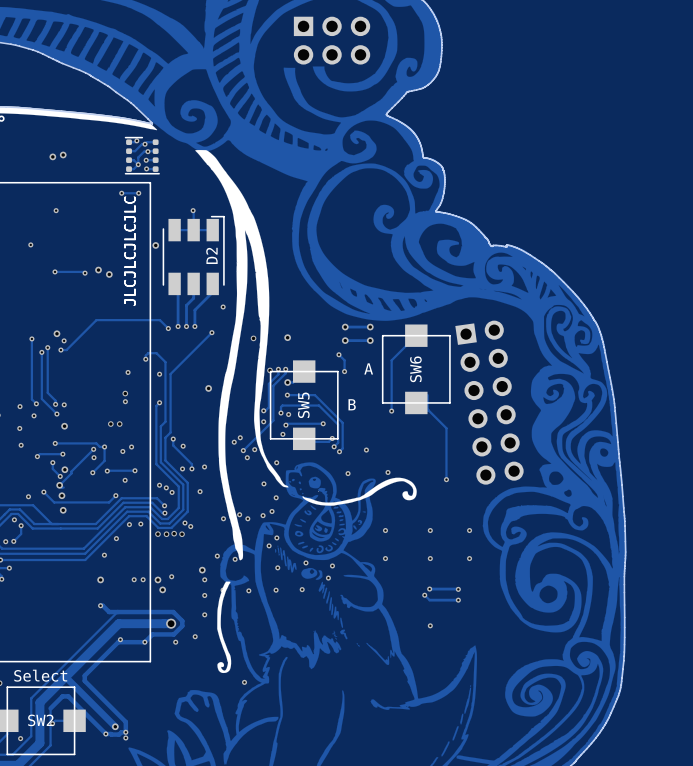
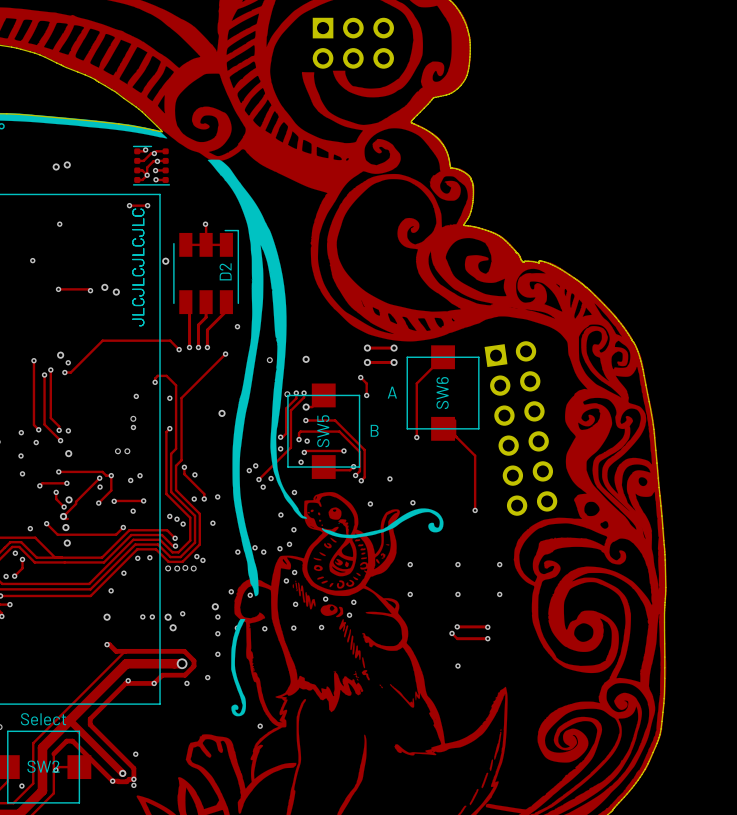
via: none -> (135, 754)

